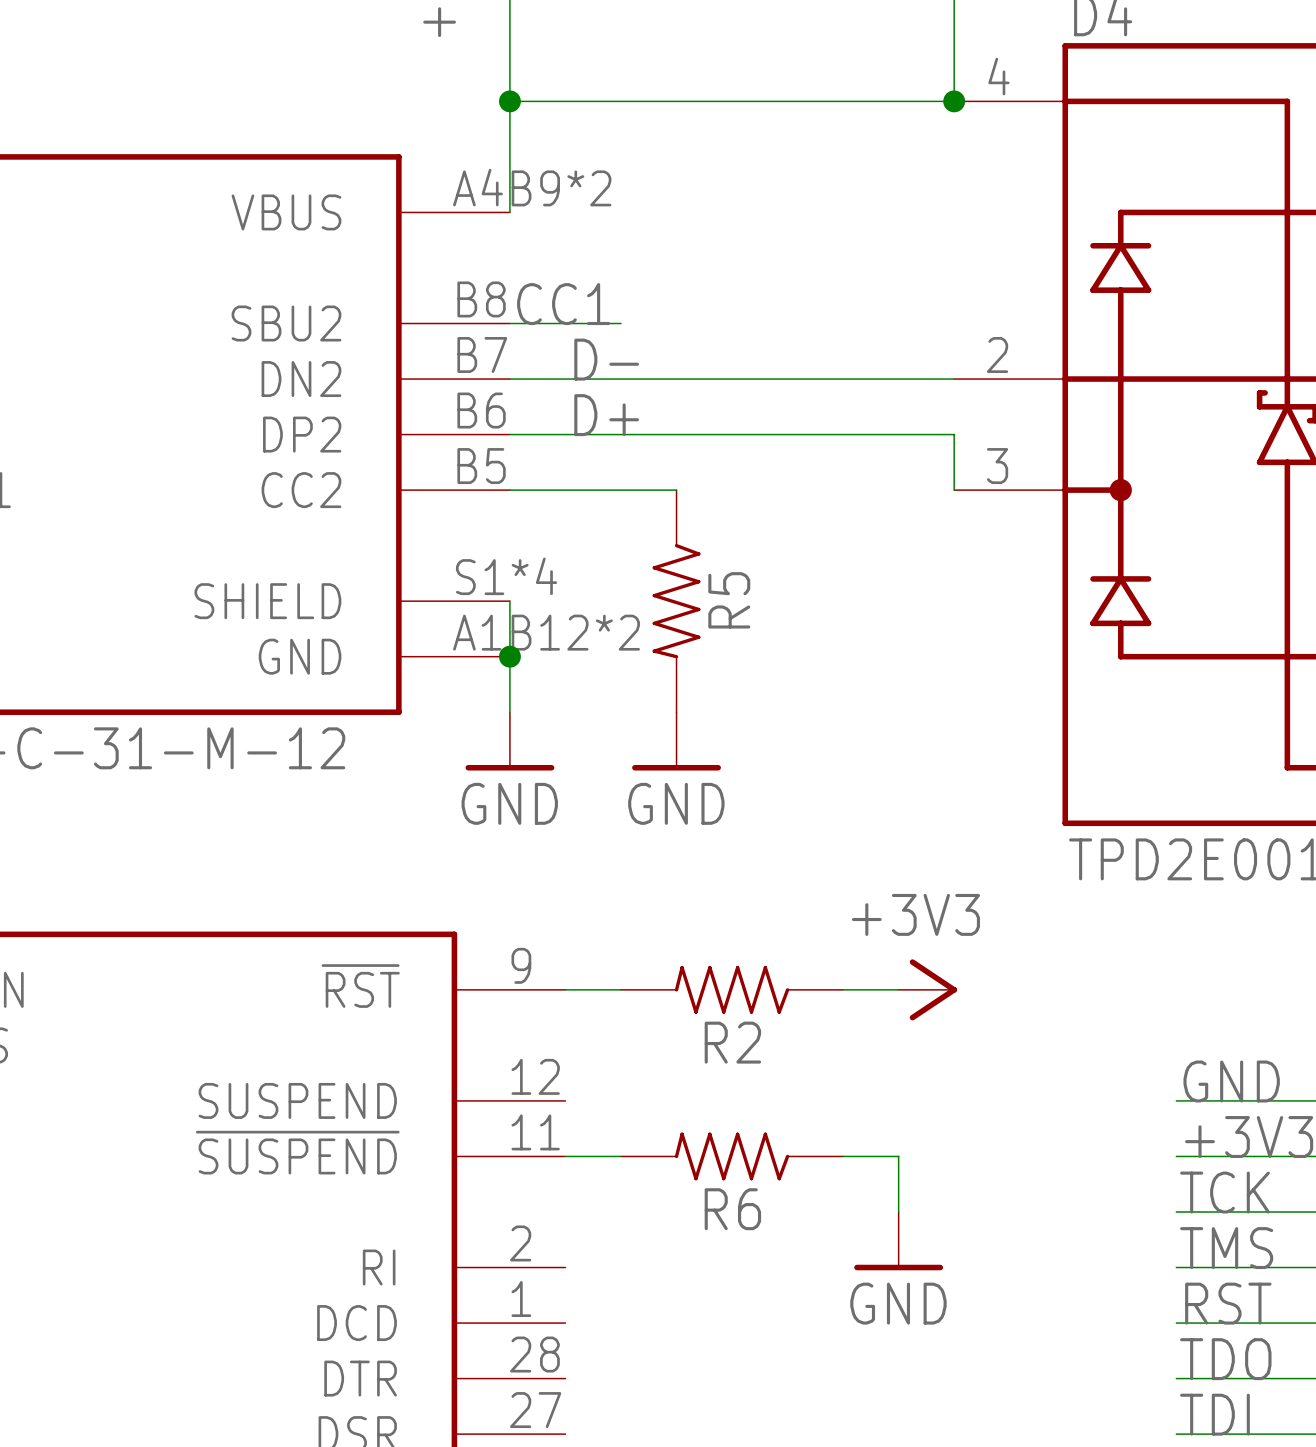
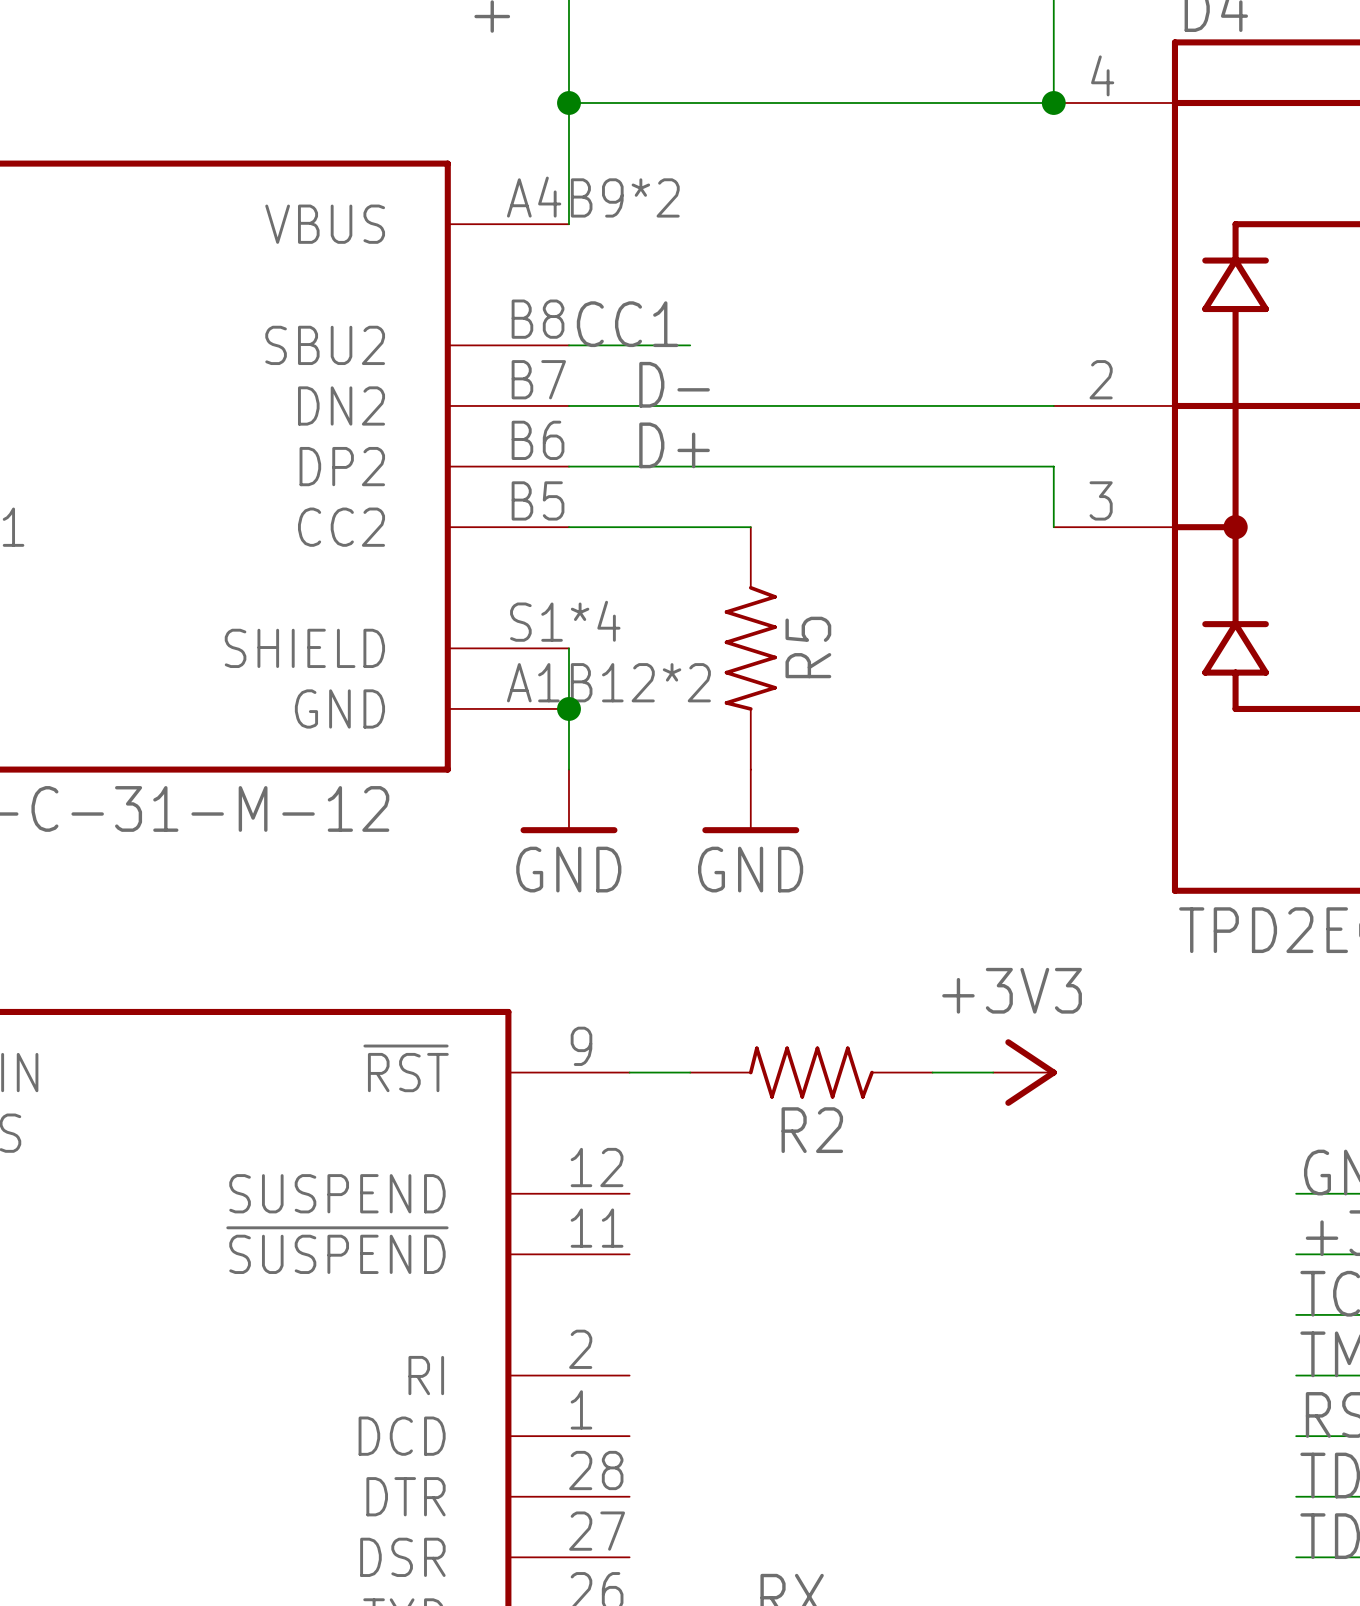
wire: (565, 1156) (620, 1156) -> none
R6: (732, 1156) -> none
wire: (843, 1156) (898, 1156) (898, 1211) -> none
power symbol: GND (898, 1241) -> none

